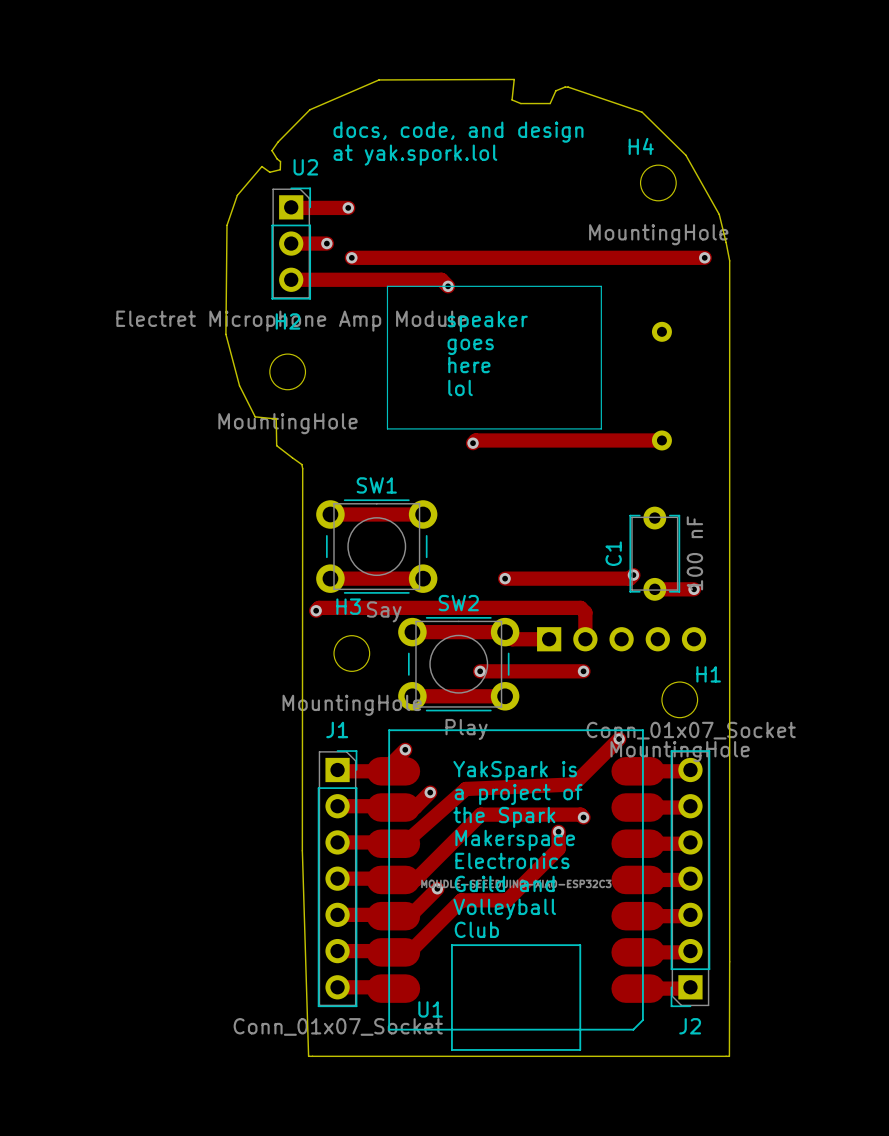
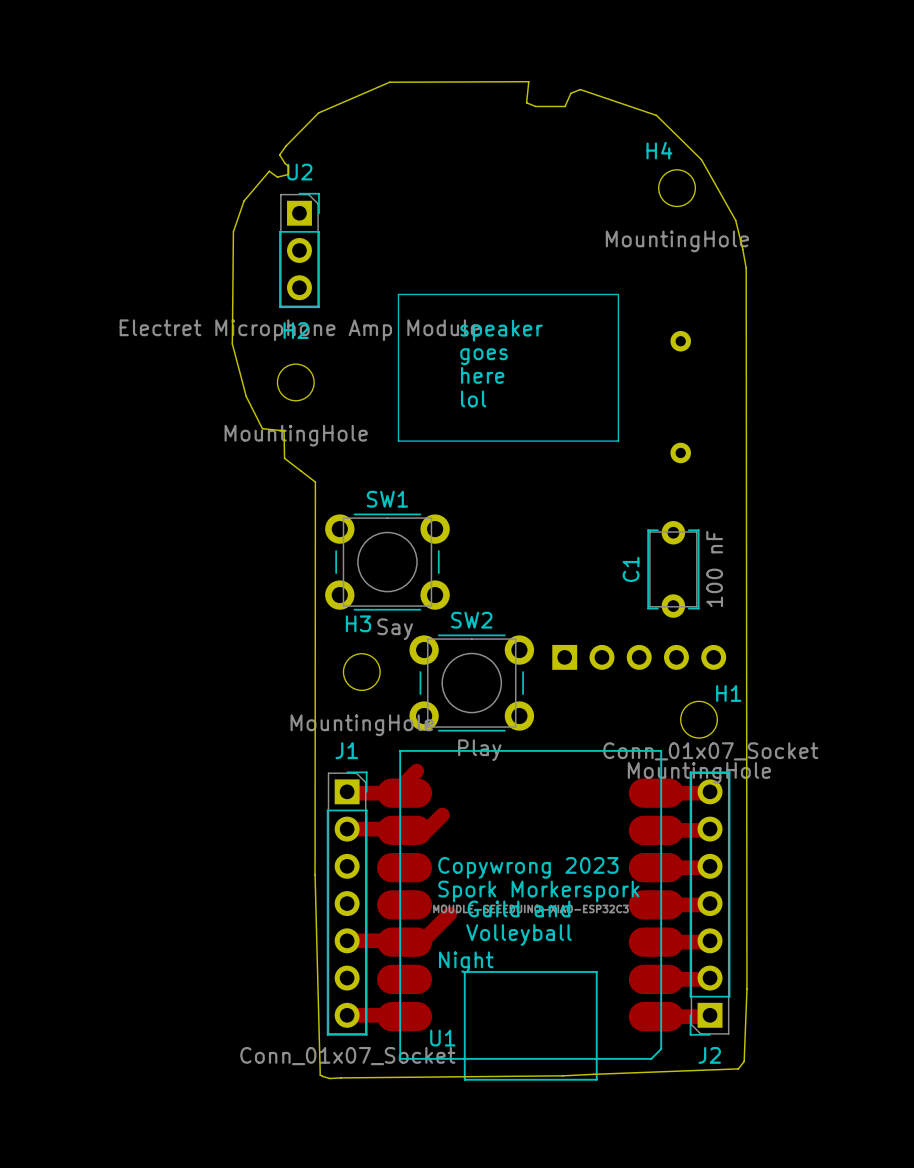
board edge: (549, 103) (555, 90) (568, 87) (642, 112) (685, 155) (719, 214) (729, 260) (729, 1056) (308, 1056) (302, 850) (302, 468) (301, 464) (292, 457) -> (565, 106) (570, 93) (580, 89) (656, 115) (701, 159) (735, 220) (742, 249) (746, 268) (746, 989) (744, 1061) (738, 1068) (562, 1075) (329, 1078) (320, 1075) (315, 874) (315, 482) (300, 470)
text: docs, code, and design (458, 132) -> none
text: at yak.spork.lol (415, 155) -> none
U2 name position: U2 (305, 167) -> U2 (299, 172)
track: (291, 207) (348, 207) -> none
via: (348, 207) -> none
track: (291, 243) (326, 243) -> none
via: (326, 243) -> none
track: (351, 257) (704, 257) -> none
via: (351, 257) -> none
via: (704, 257) -> none
track: (291, 279) (441, 279) (448, 286) -> none
via: (448, 286) -> none
track: (661, 440) (475, 440) (473, 443) -> none
via: (473, 443) -> none
track: (330, 514) (423, 514) -> none
track: (633, 575) (629, 578) (505, 578) -> none
via: (633, 575) -> none
track: (330, 578) (423, 578) -> none
via: (505, 578) -> none
track: (654, 589) (694, 589) -> none
via: (694, 589) -> none
track: (316, 610) (319, 607) (580, 607) (585, 612) (585, 639) -> none
via: (316, 610) -> none
track: (412, 632) (505, 632) (512, 639) (549, 639) -> none
track: (480, 671) (583, 671) -> none
via: (480, 671) -> none
via: (583, 671) -> none
track: (412, 696) (505, 696) -> none
track: (619, 739) (573, 784) (465, 788) (403, 843) (337, 842) -> none
via: (619, 739) -> none
via: (405, 749) -> none
text: YakSpark is (515, 771) -> none
via: (430, 792) -> none
text: a project of (518, 794) -> none
text: the Spark (504, 817) -> none
track: (583, 817) (580, 814) (480, 814) (415, 879) (337, 878) -> none
via: (583, 817) -> none
track: (558, 831) (558, 848) (507, 900) (461, 900) (409, 952) (337, 951) -> none
via: (558, 831) -> none
text: Makerspace (515, 840) -> none
text: none -> Copywrong 2023 (528, 867)
text: Electronics (512, 860) -> none
text: none -> Spork Morkerspork (538, 891)
via: (437, 888) -> none
text: Club (476, 929) -> none
text: none -> Night (466, 962)

